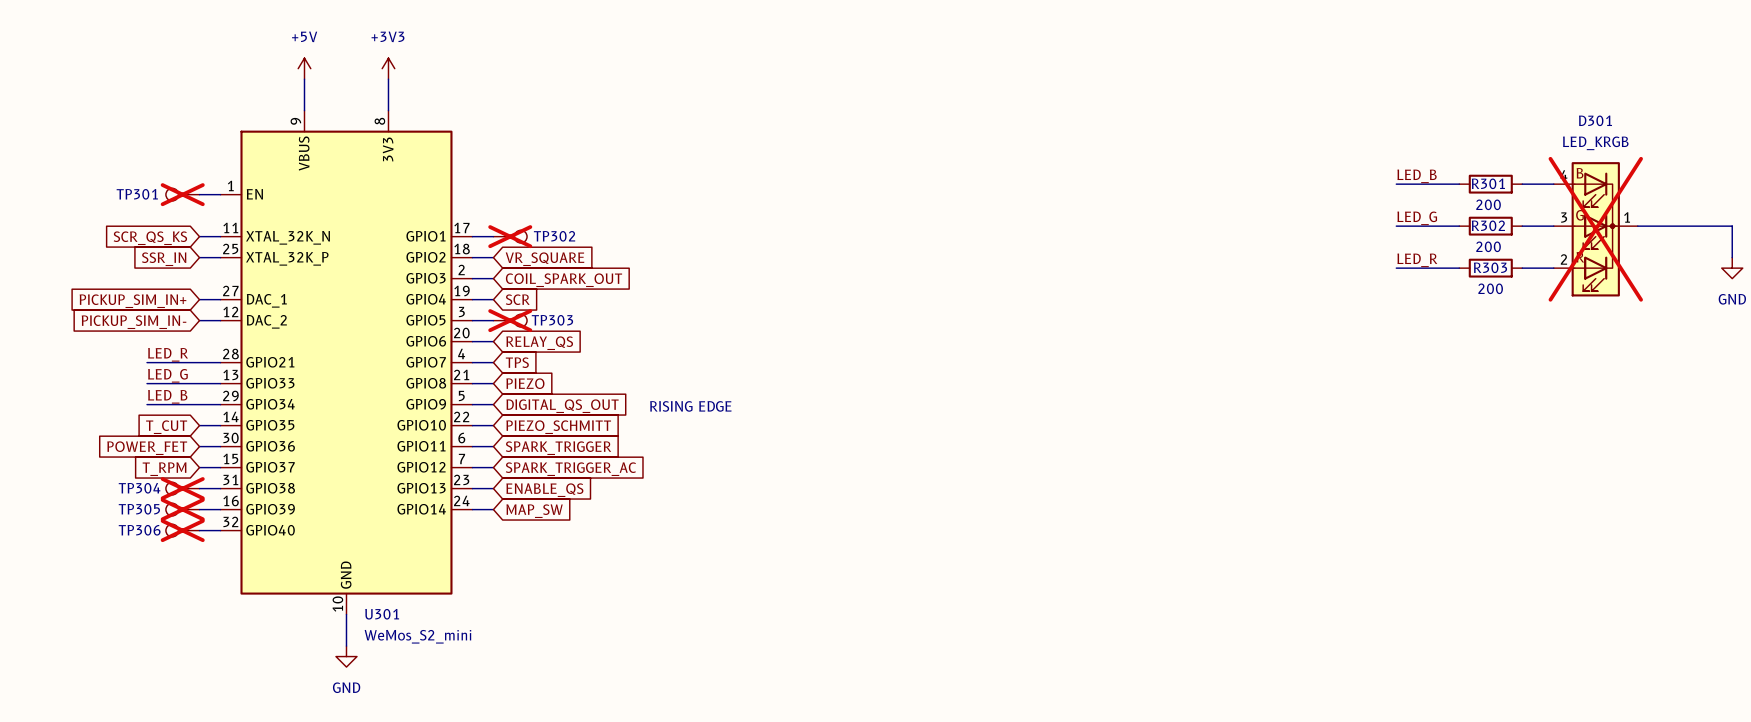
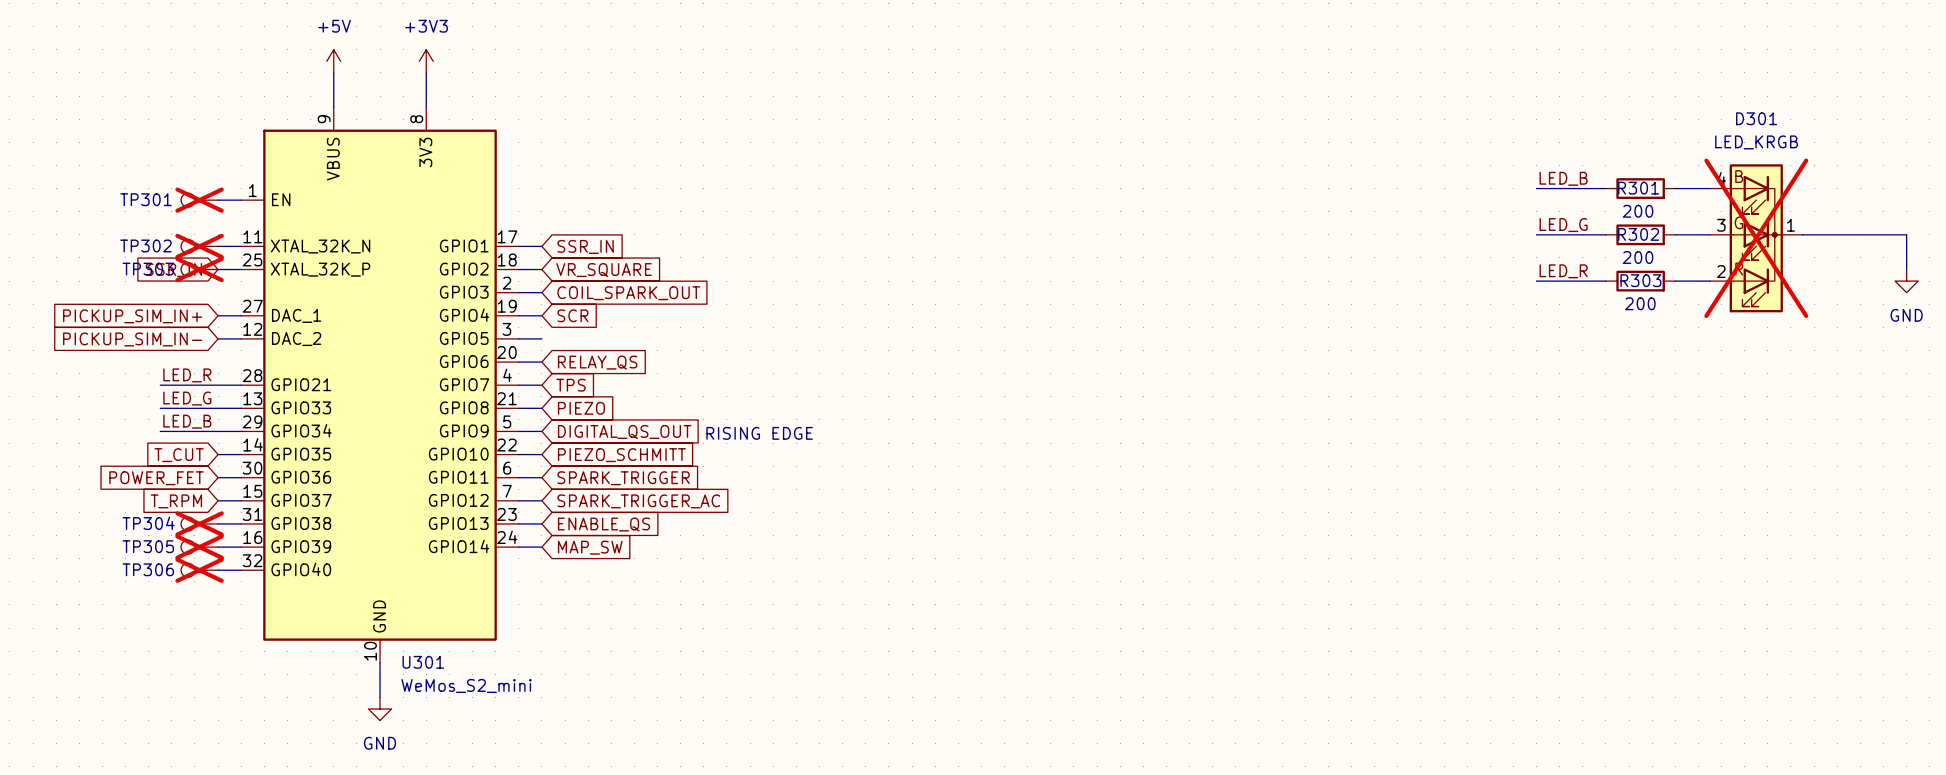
TP302 position: (510, 236) -> (199, 246)
TP302 rotation: 0° (520, 236) -> 180° (188, 246)
global label: SCR_QS_KS (150, 238) -> none
global label: none -> SSR_IN (585, 246)
TP303 position: (510, 320) -> (199, 269)
TP303 rotation: 0° (520, 320) -> 180° (188, 269)

